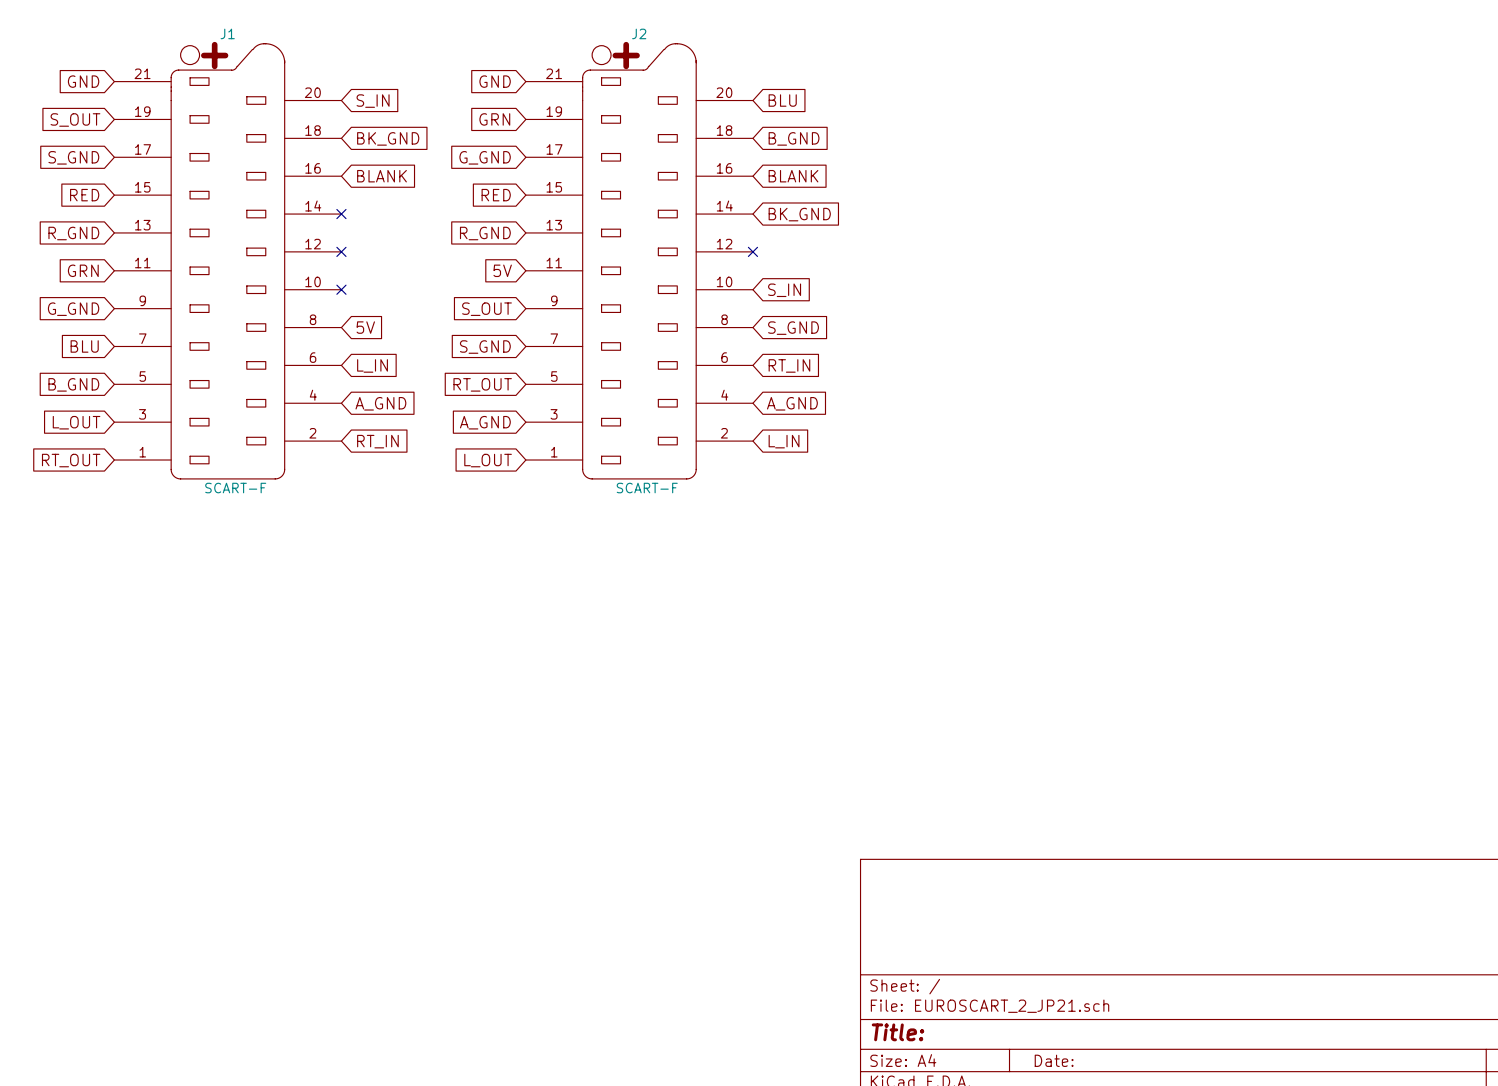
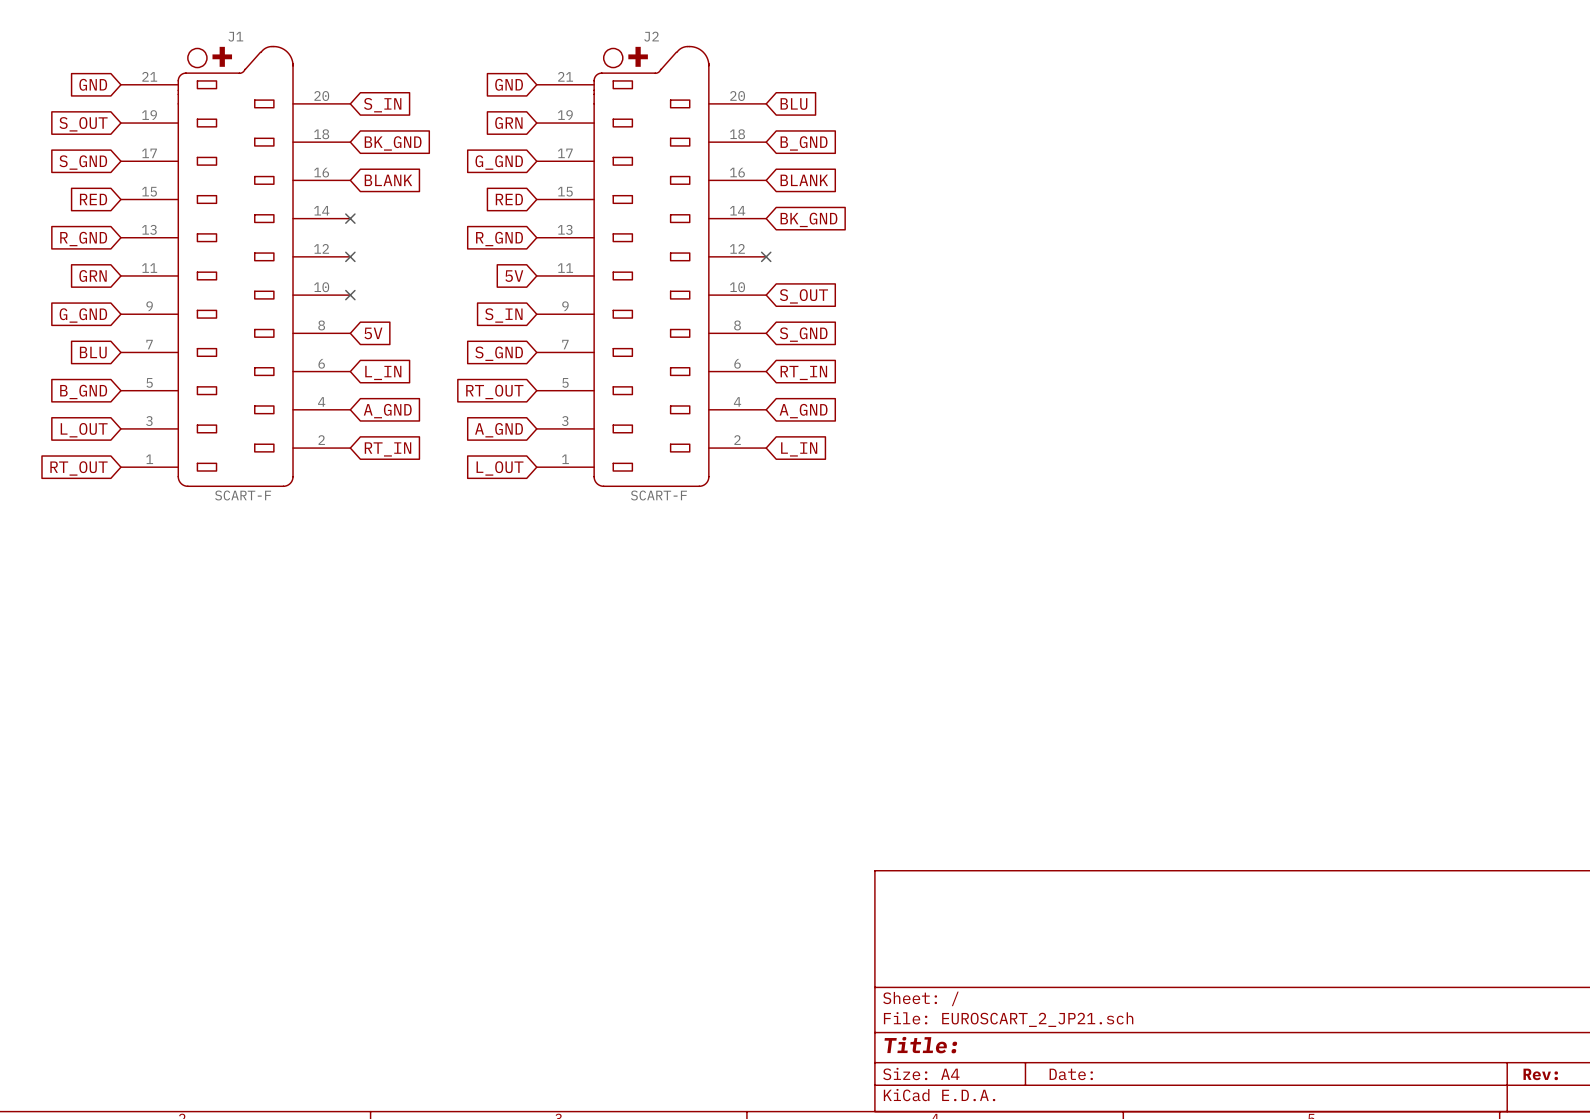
global label: S_IN (784, 290) -> S_OUT (803, 296)
global label: S_OUT (486, 309) -> S_IN (503, 315)

